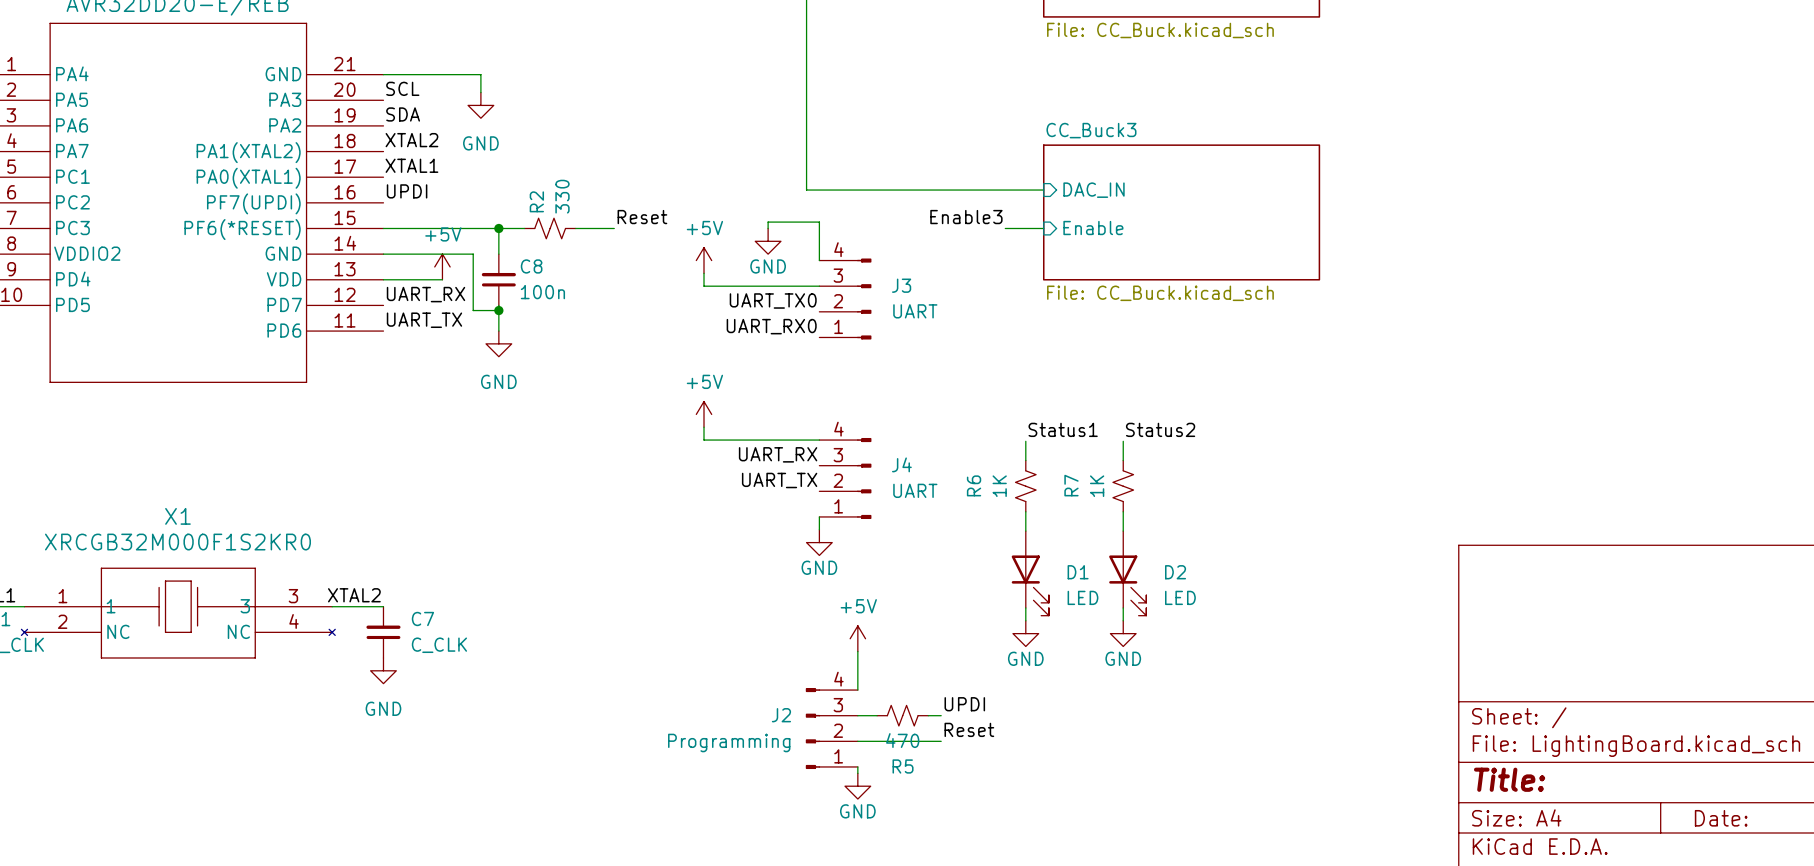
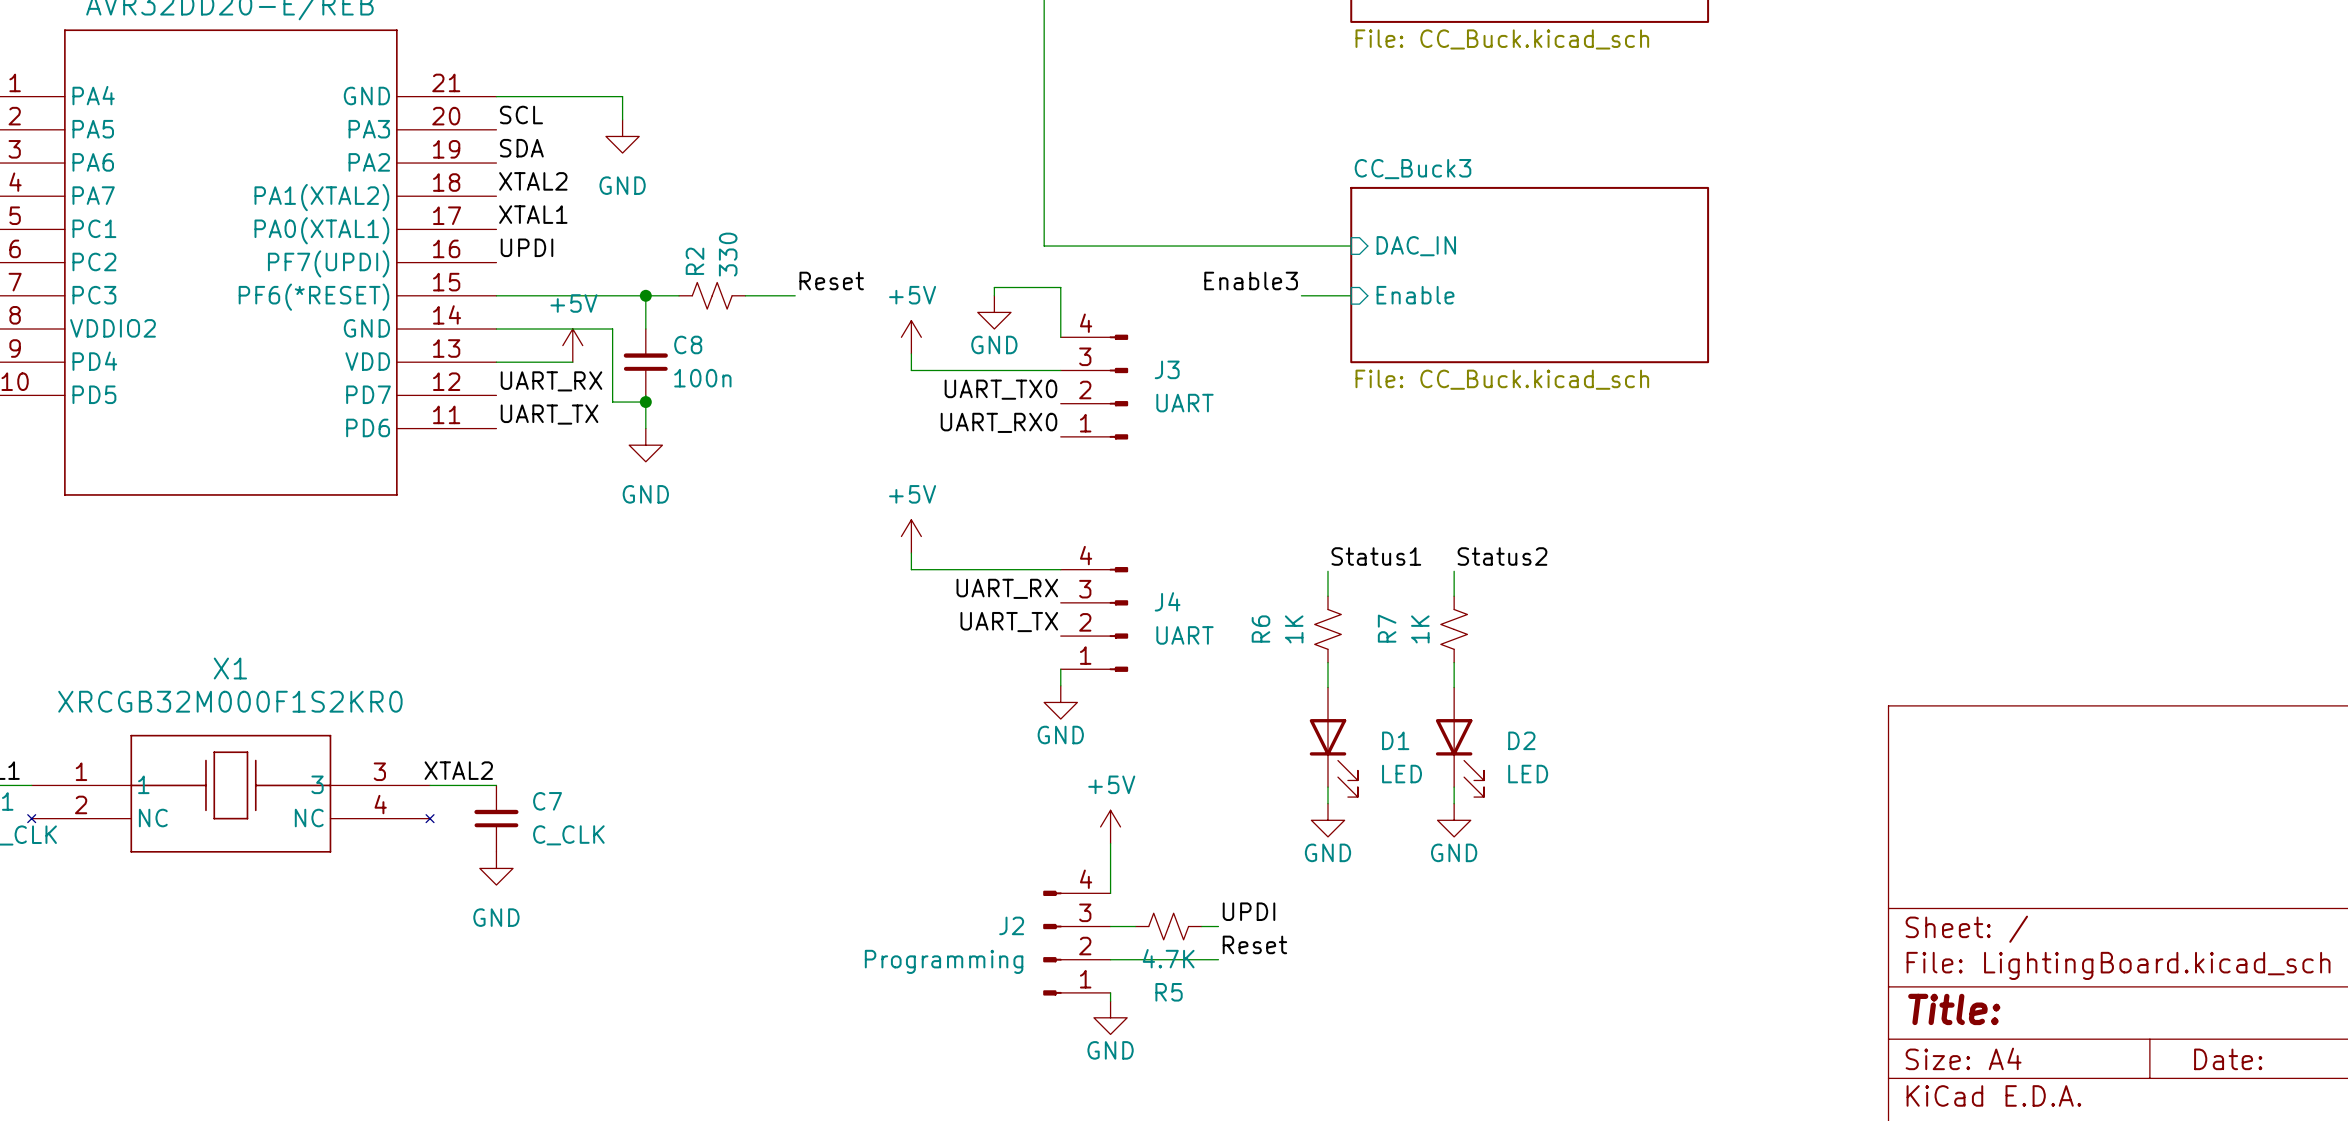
R5 value: 470 (902, 740) -> 4.7K (1168, 958)

